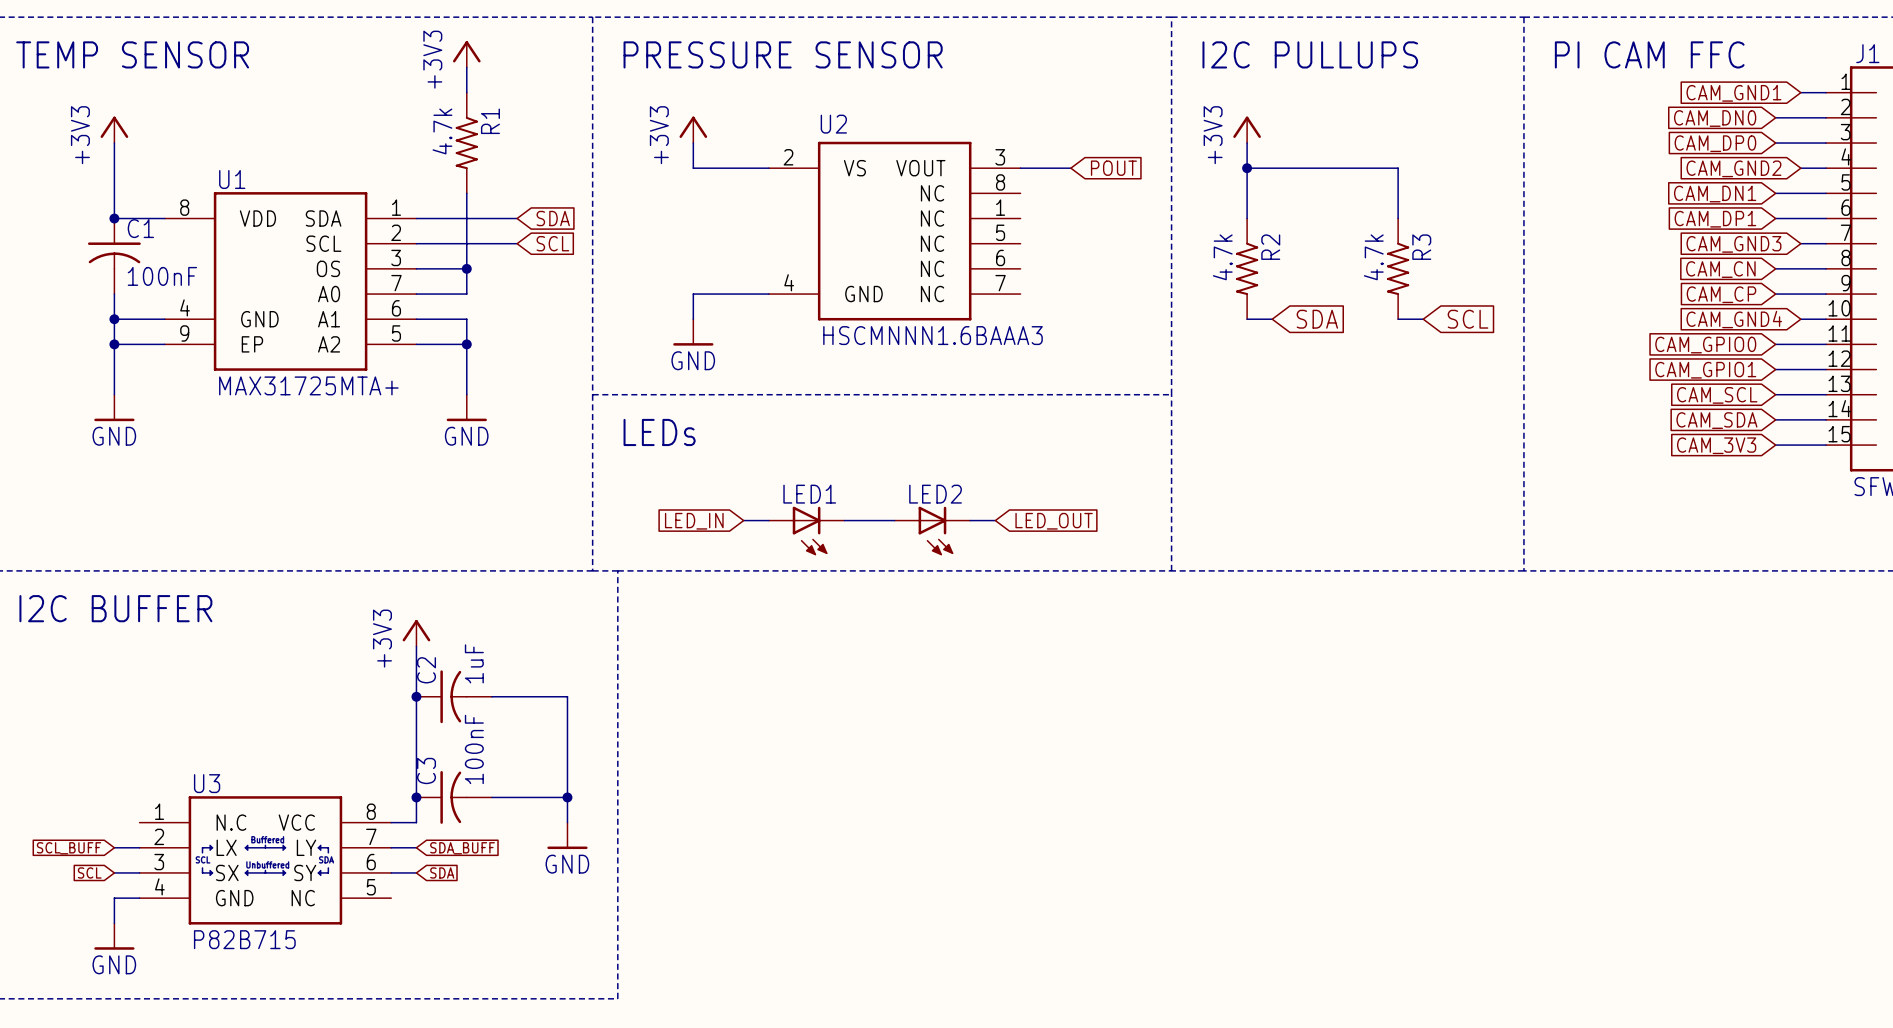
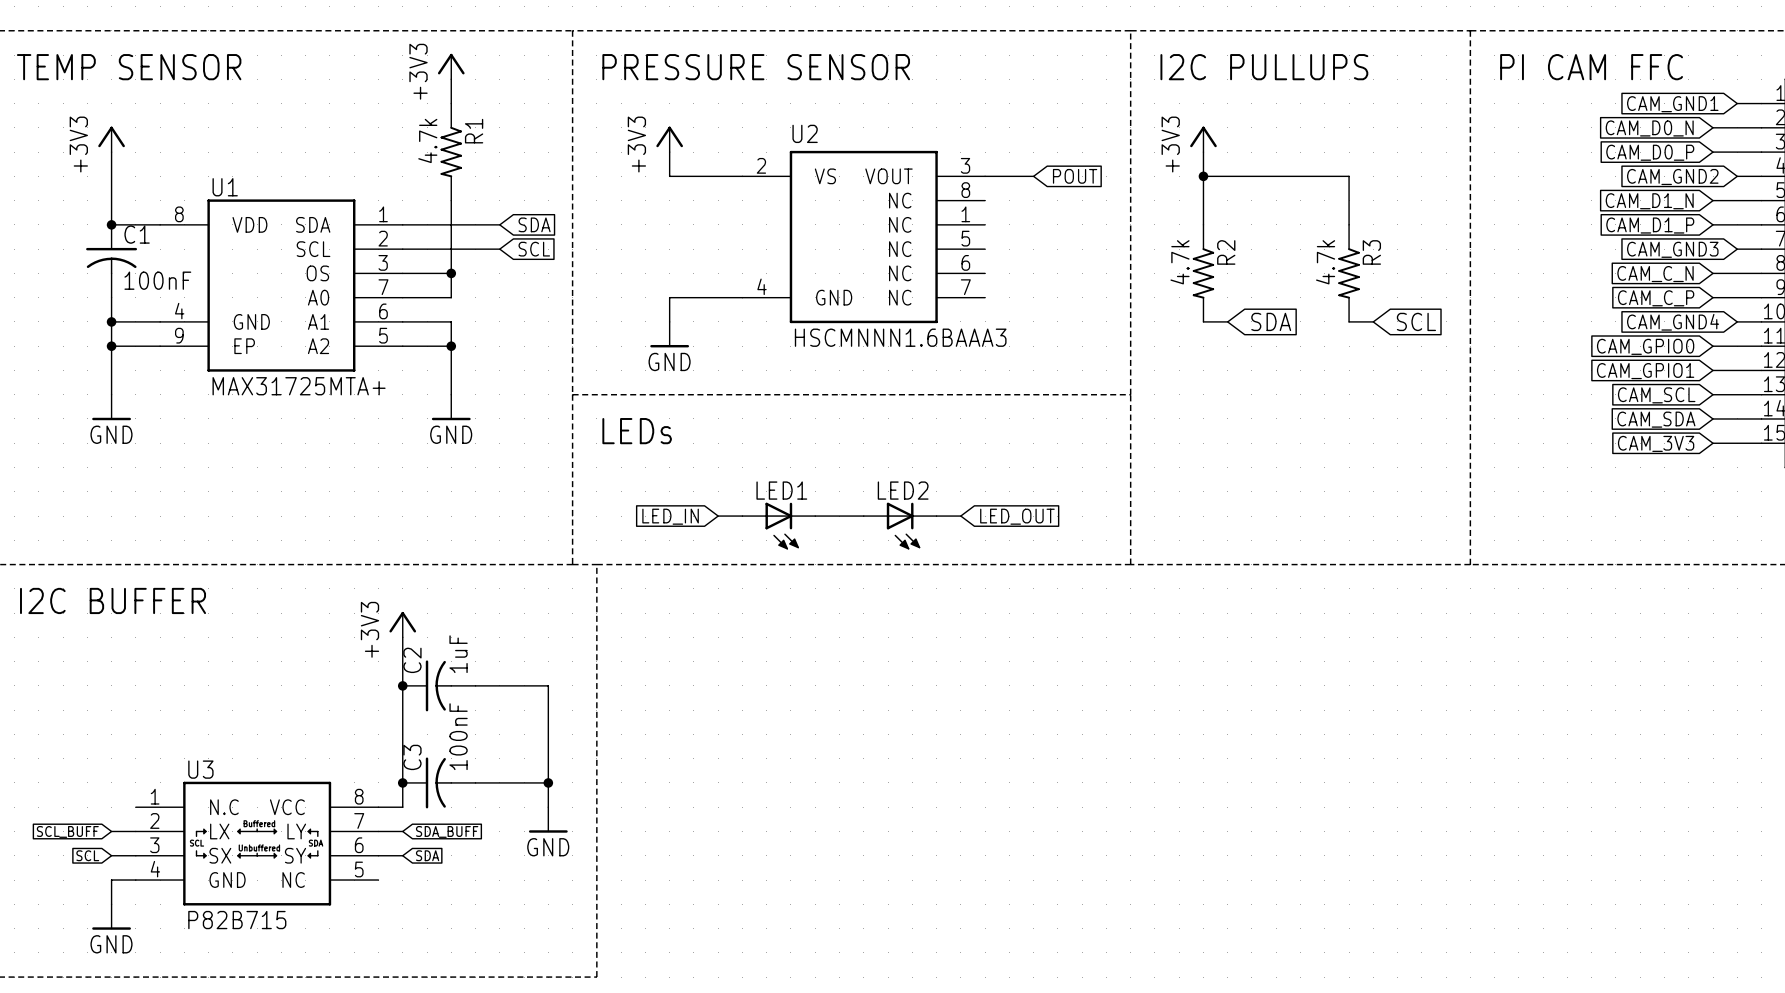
global label: CAM_DN0 (1715, 118) -> CAM_D0_N (1649, 128)
global label: CAM_DP0 (1715, 143) -> CAM_D0_P (1650, 152)
global label: CAM_DN1 (1715, 194) -> CAM_D1_N (1649, 201)
global label: CAM_DP1 (1715, 219) -> CAM_D1_P (1650, 225)
global label: CAM_CN (1720, 269) -> CAM_C_N (1655, 274)
global label: CAM_CP (1721, 294) -> CAM_C_P (1656, 298)

